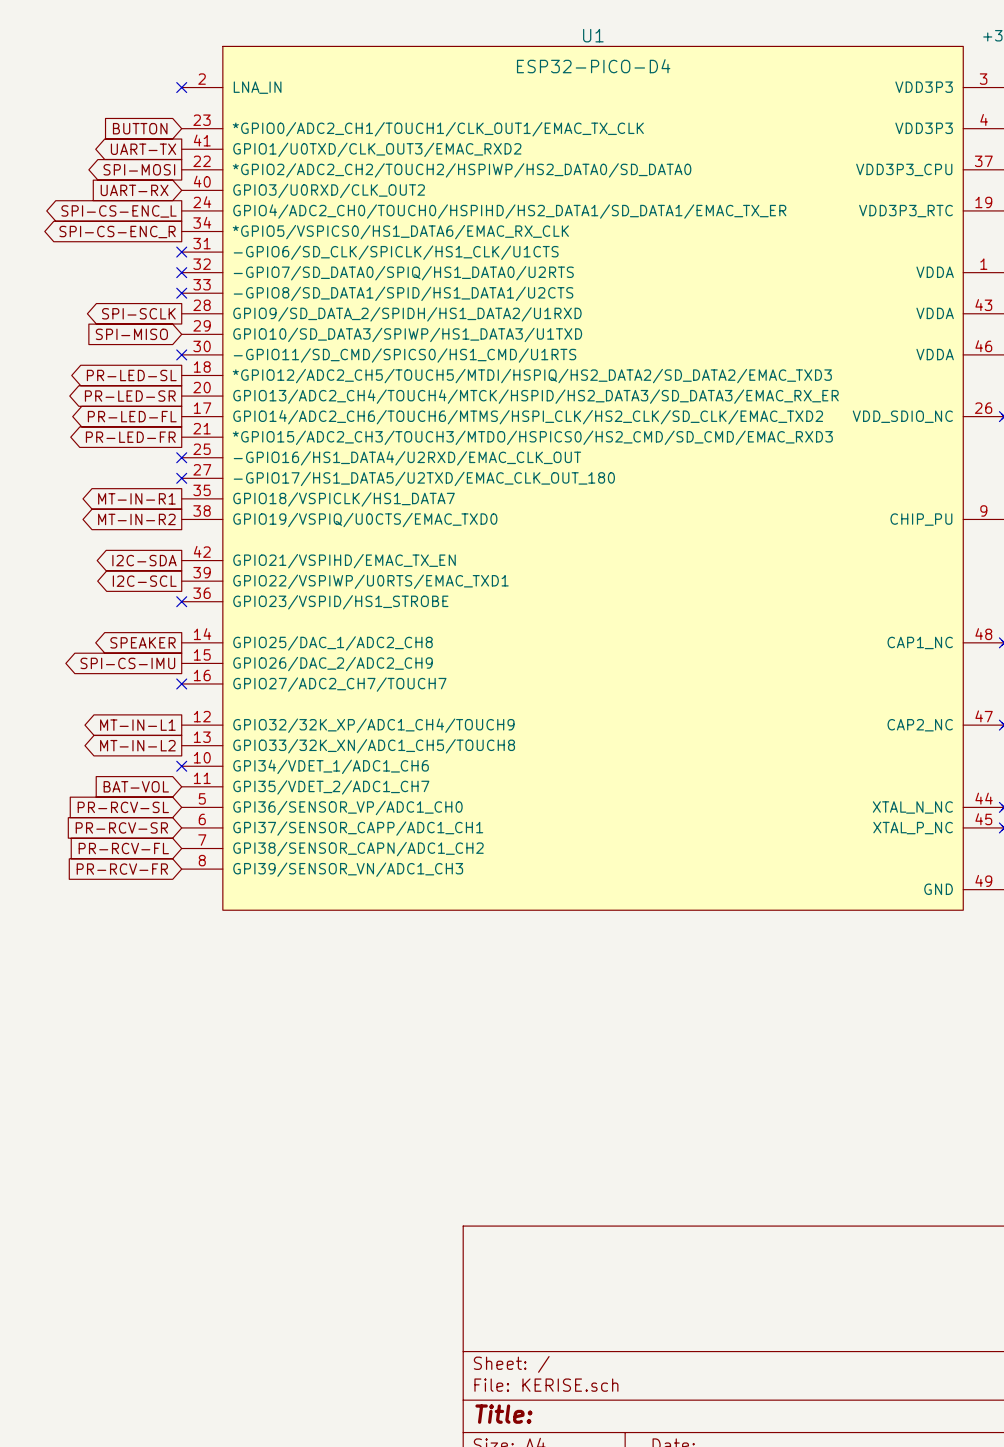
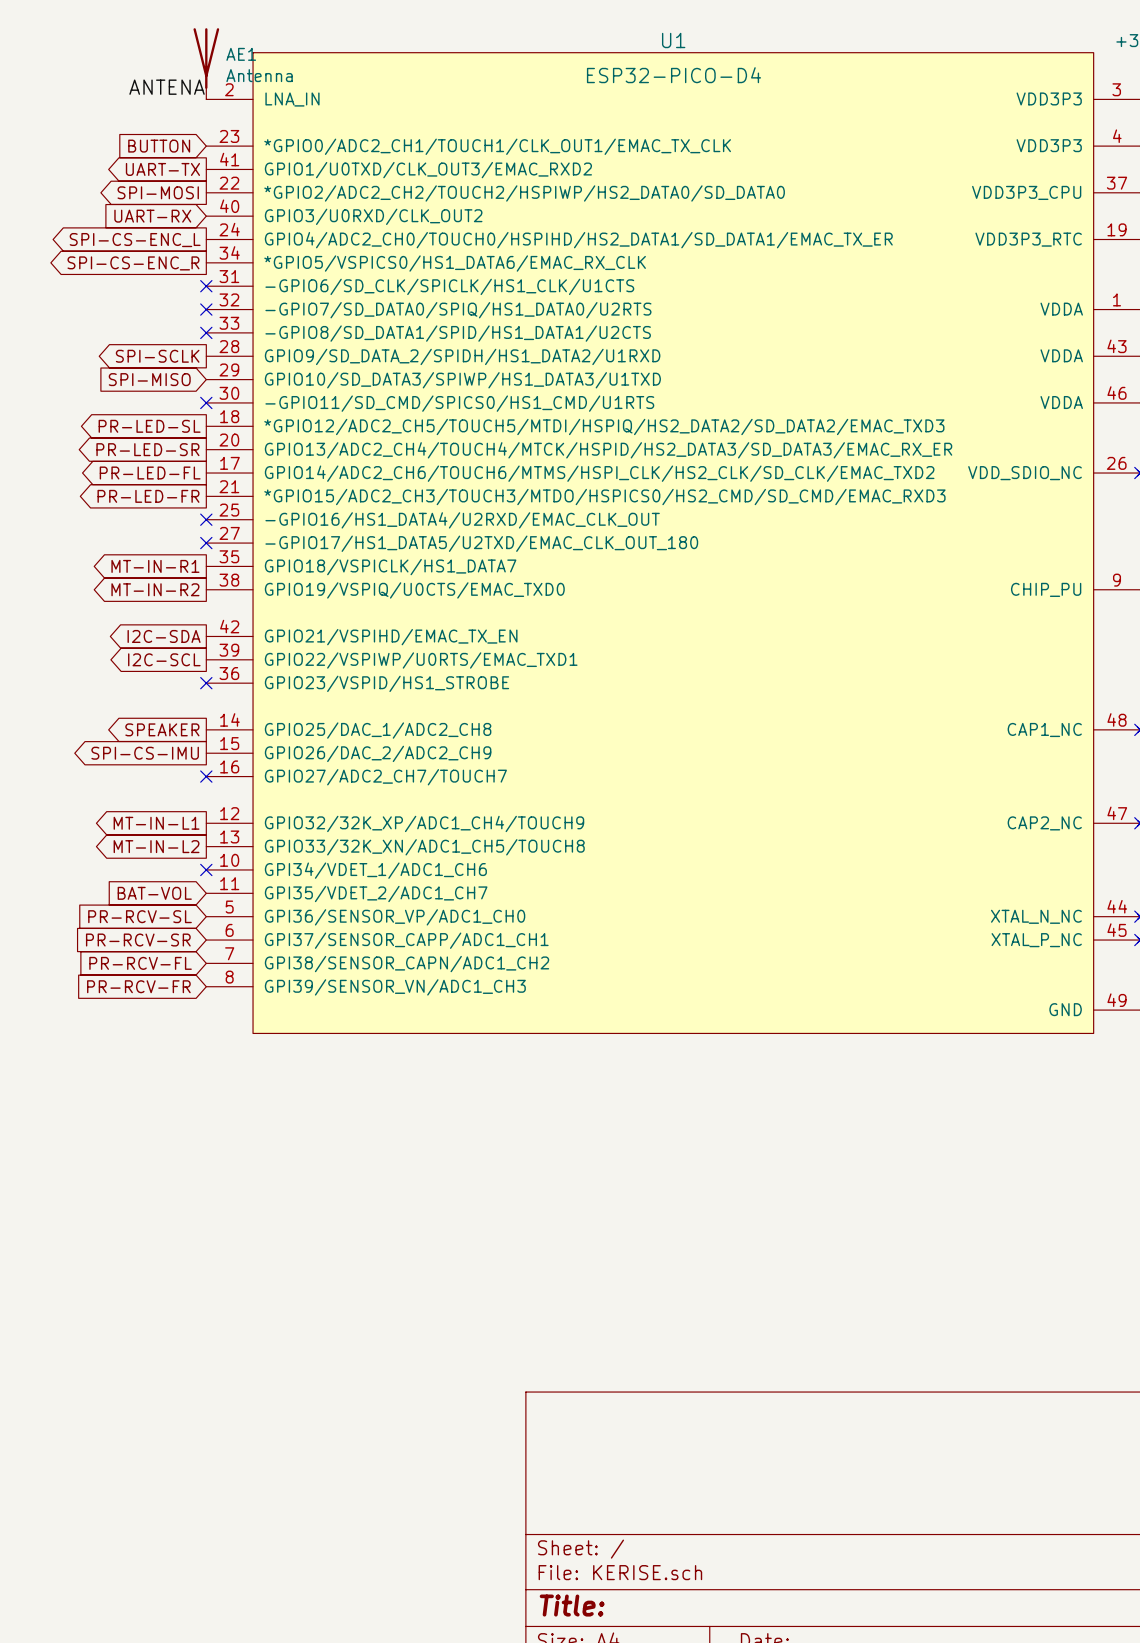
AE1: none -> Antenna (206, 63)
label: none -> ANTENA (167, 87)
no-connect mark: (181, 87) -> none

